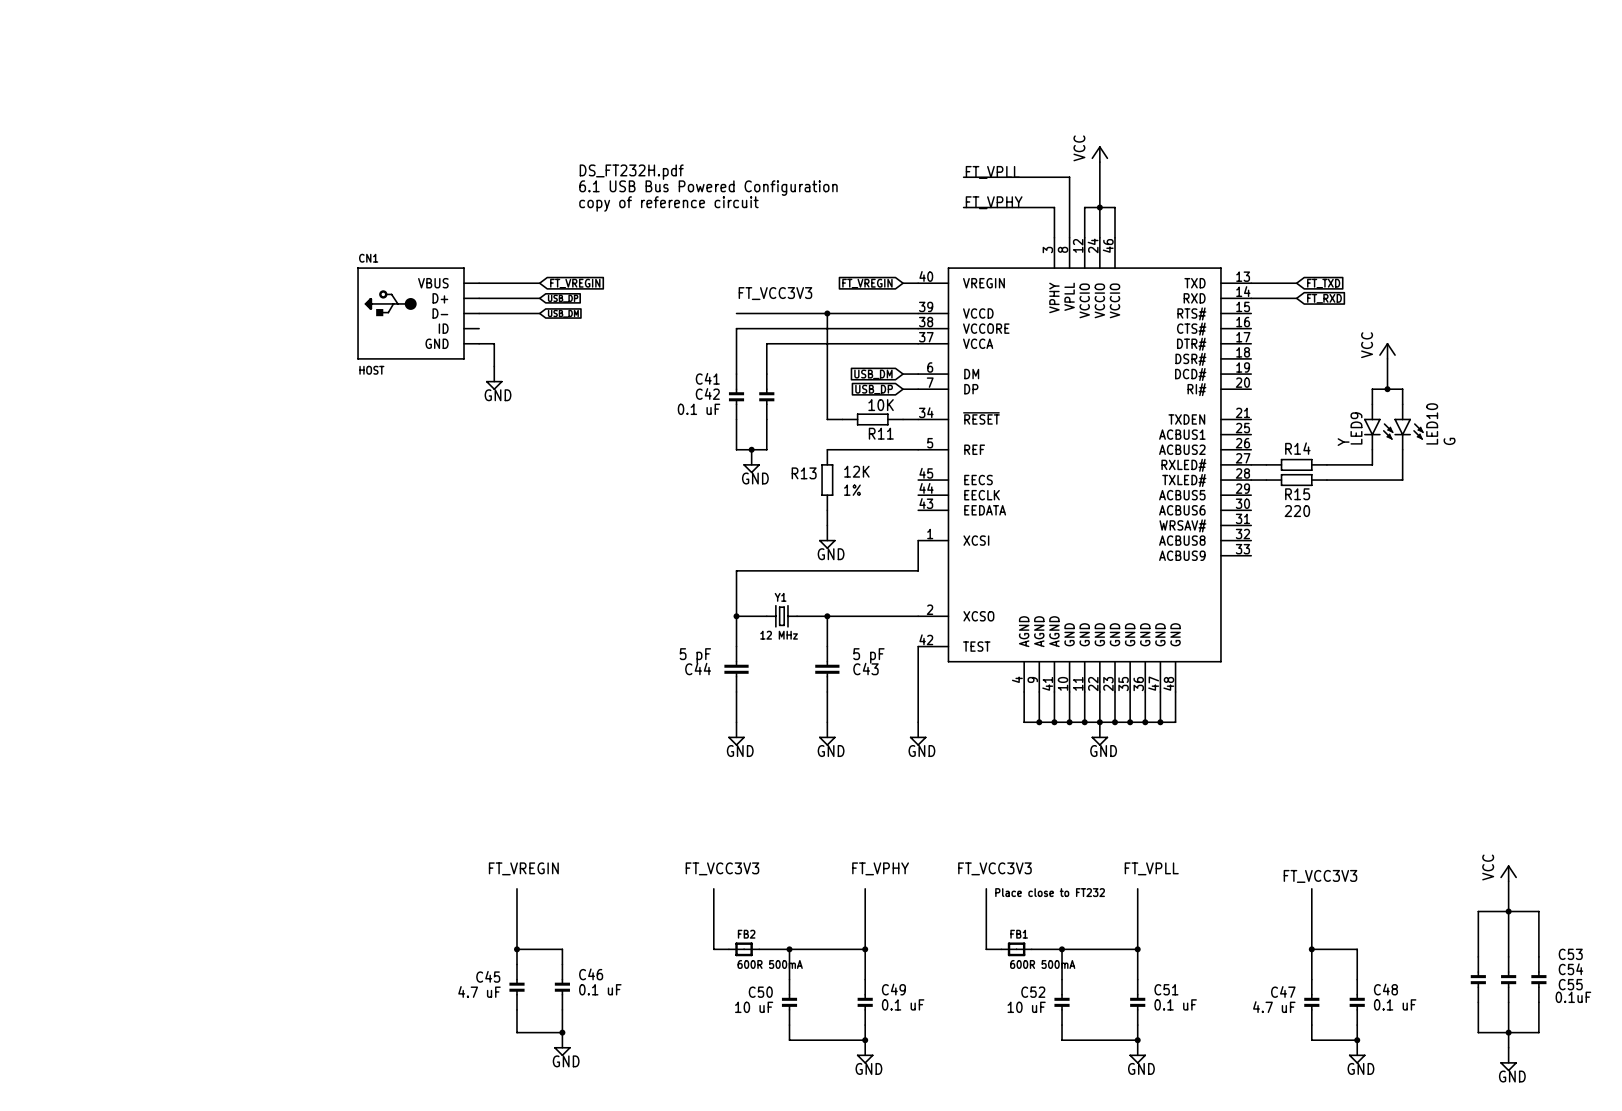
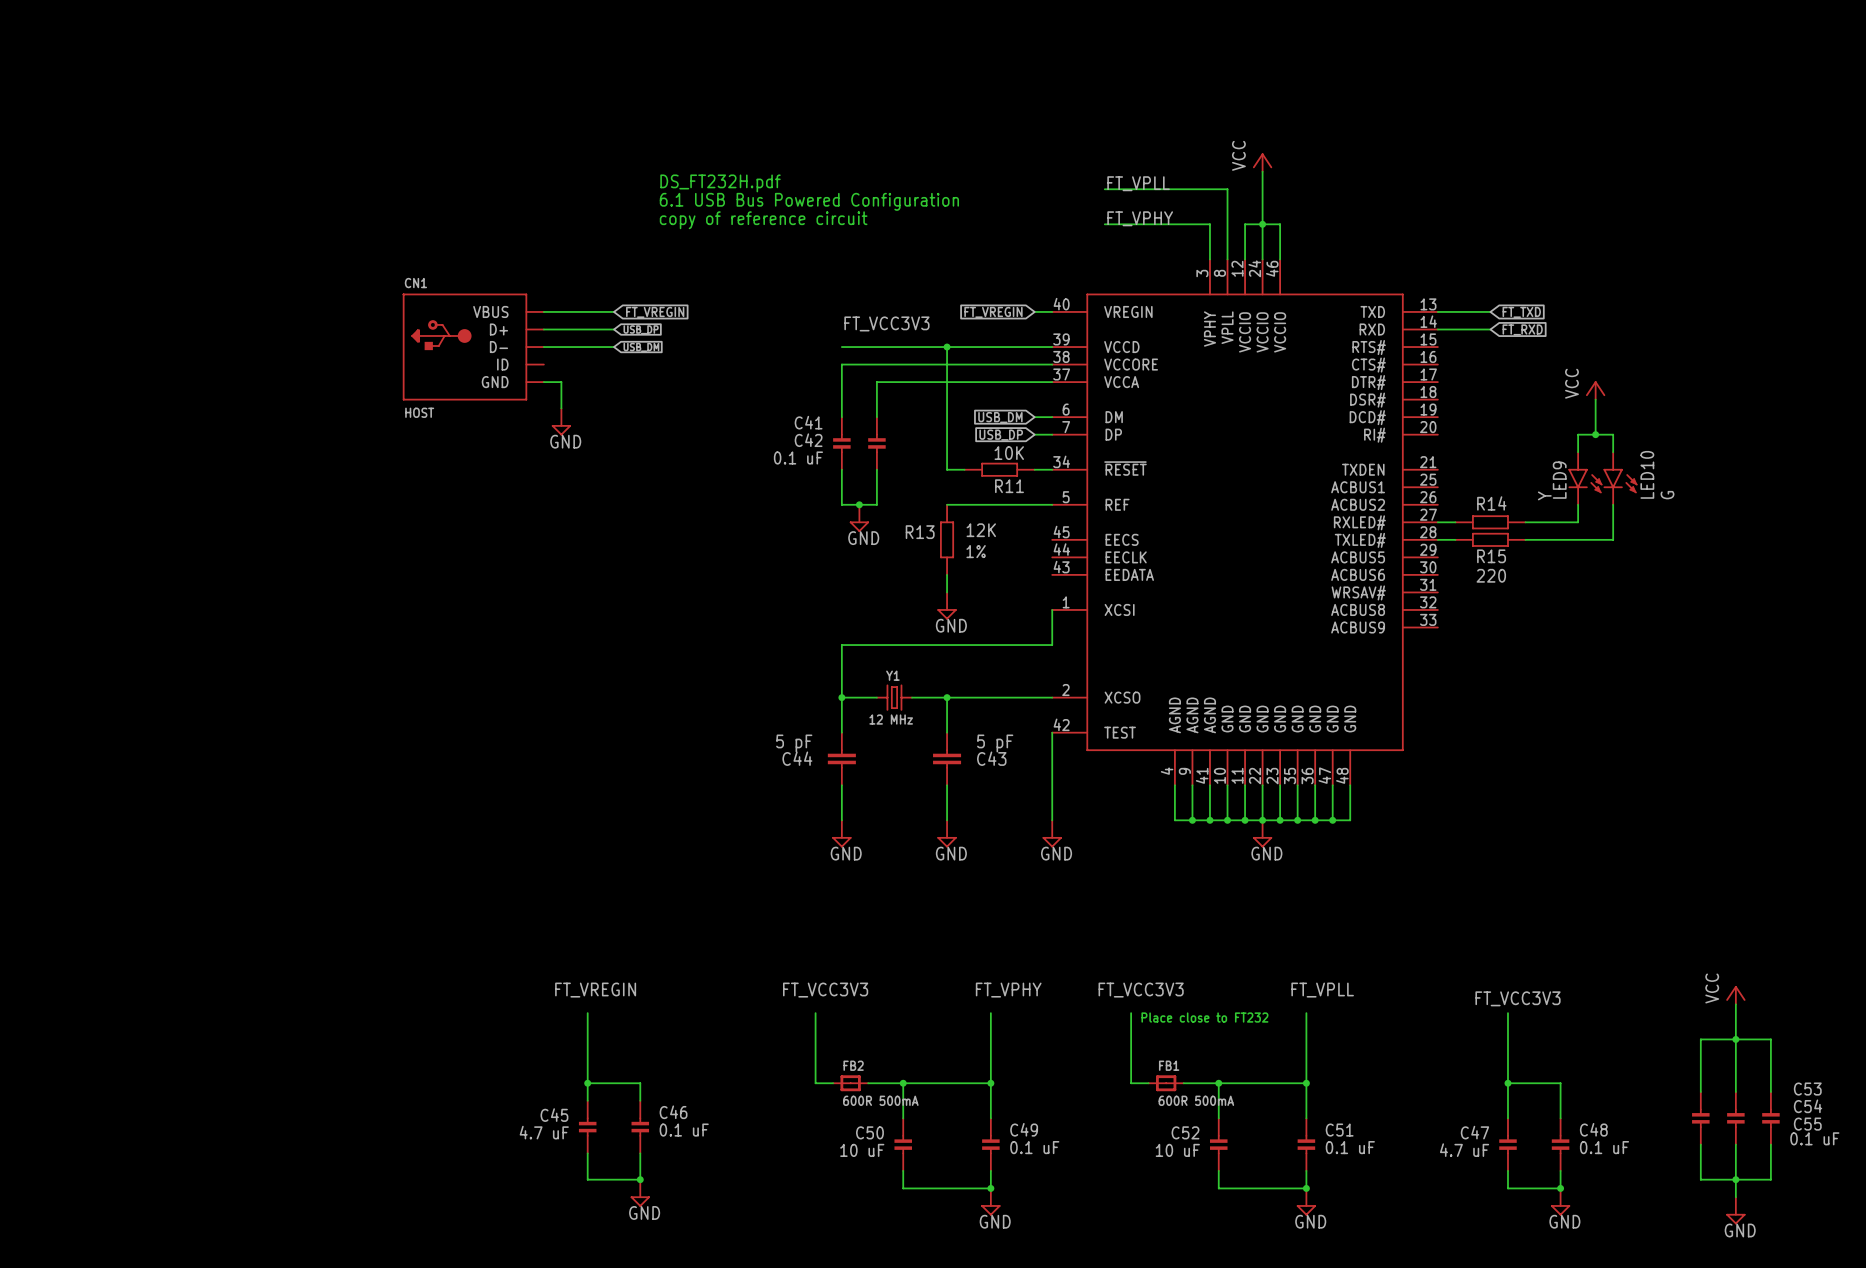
C55 value: 0.1uF (1573, 997) -> 0.1 uF (1814, 1138)

